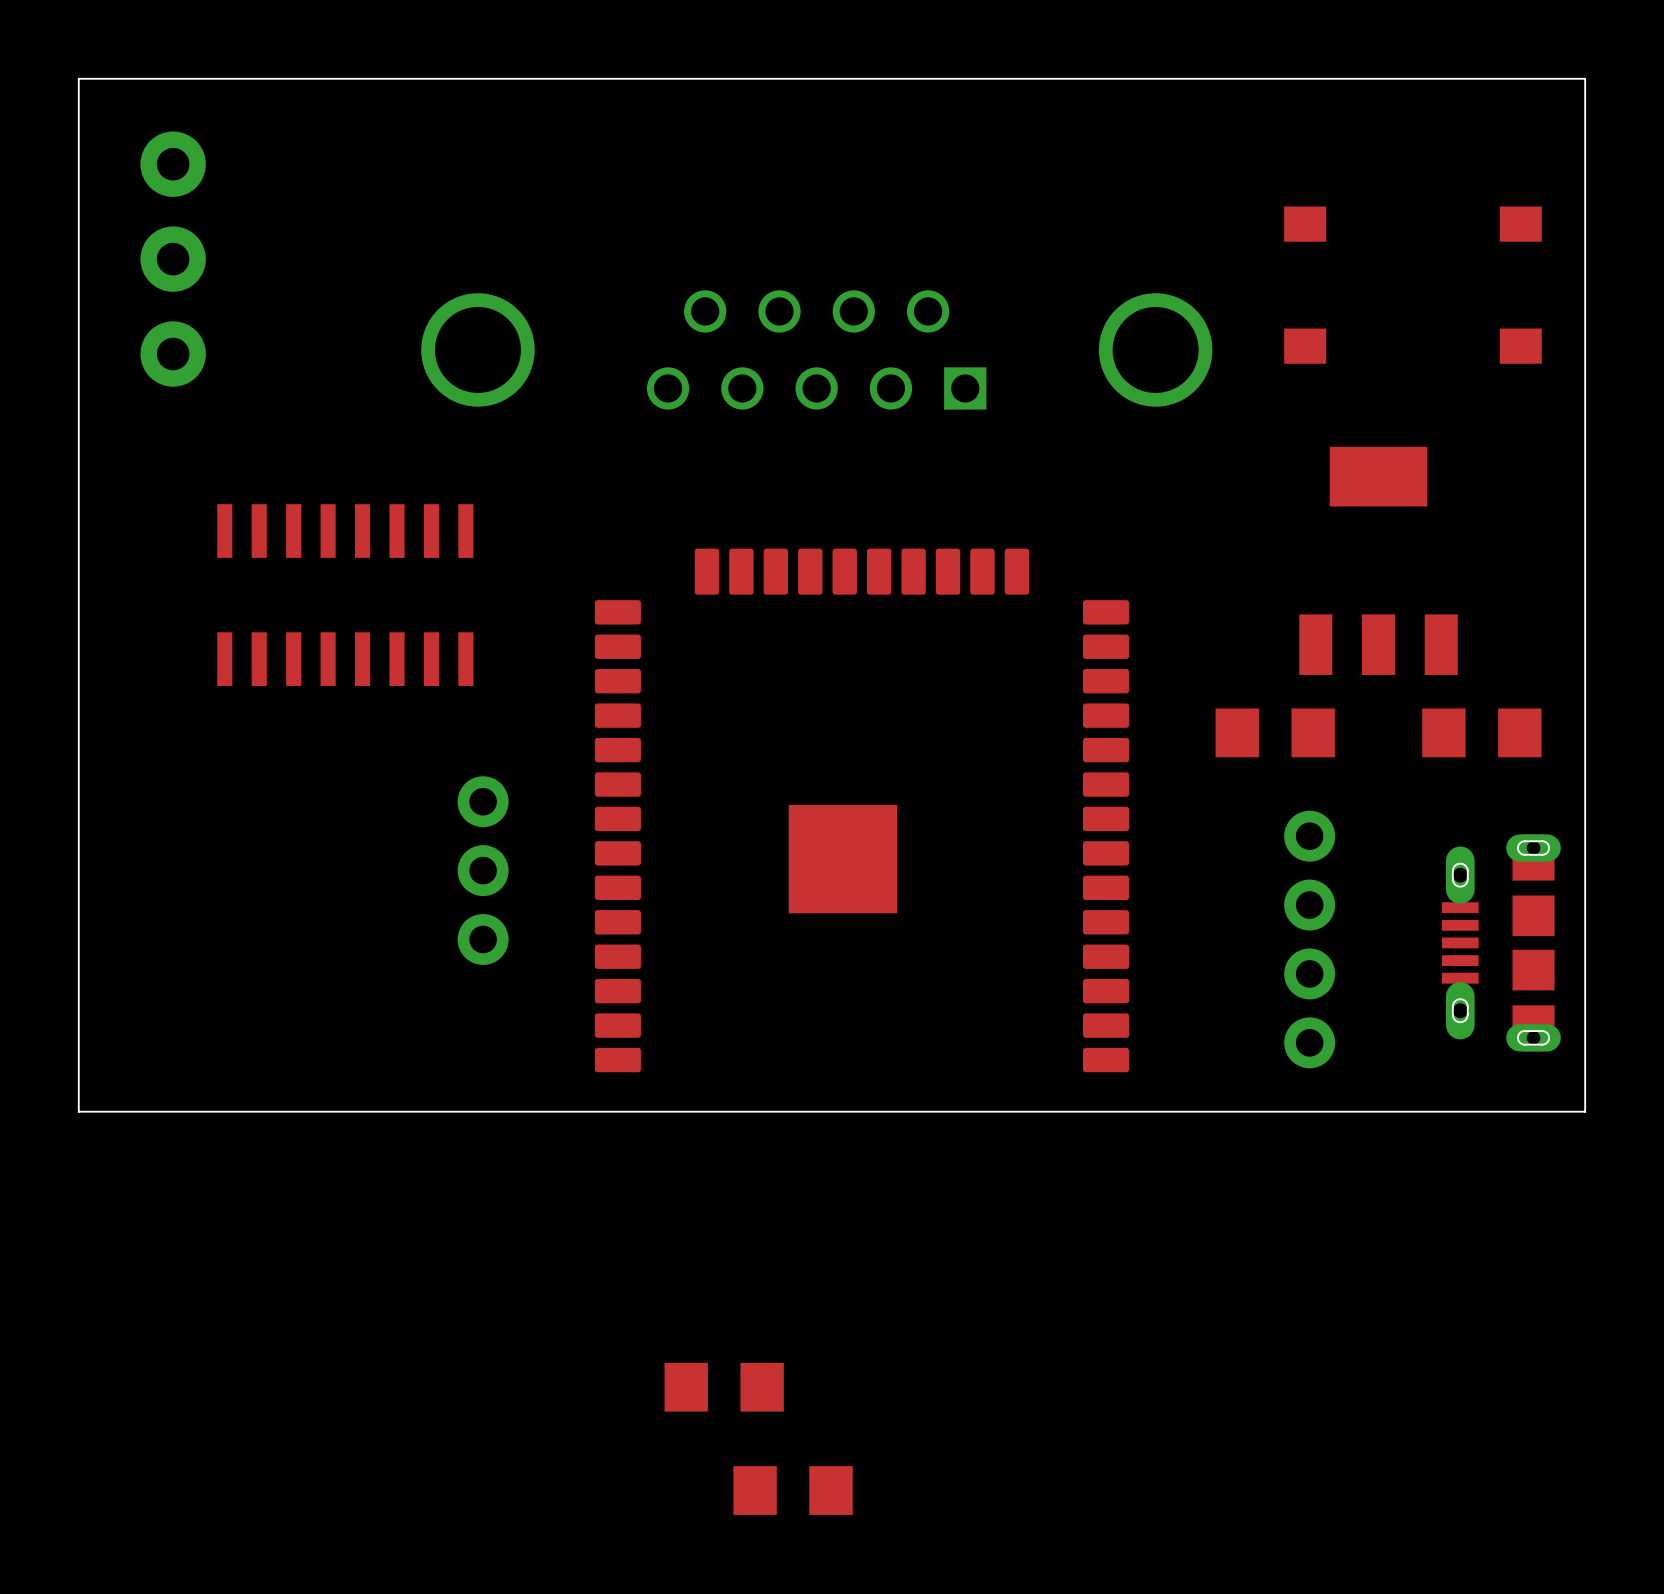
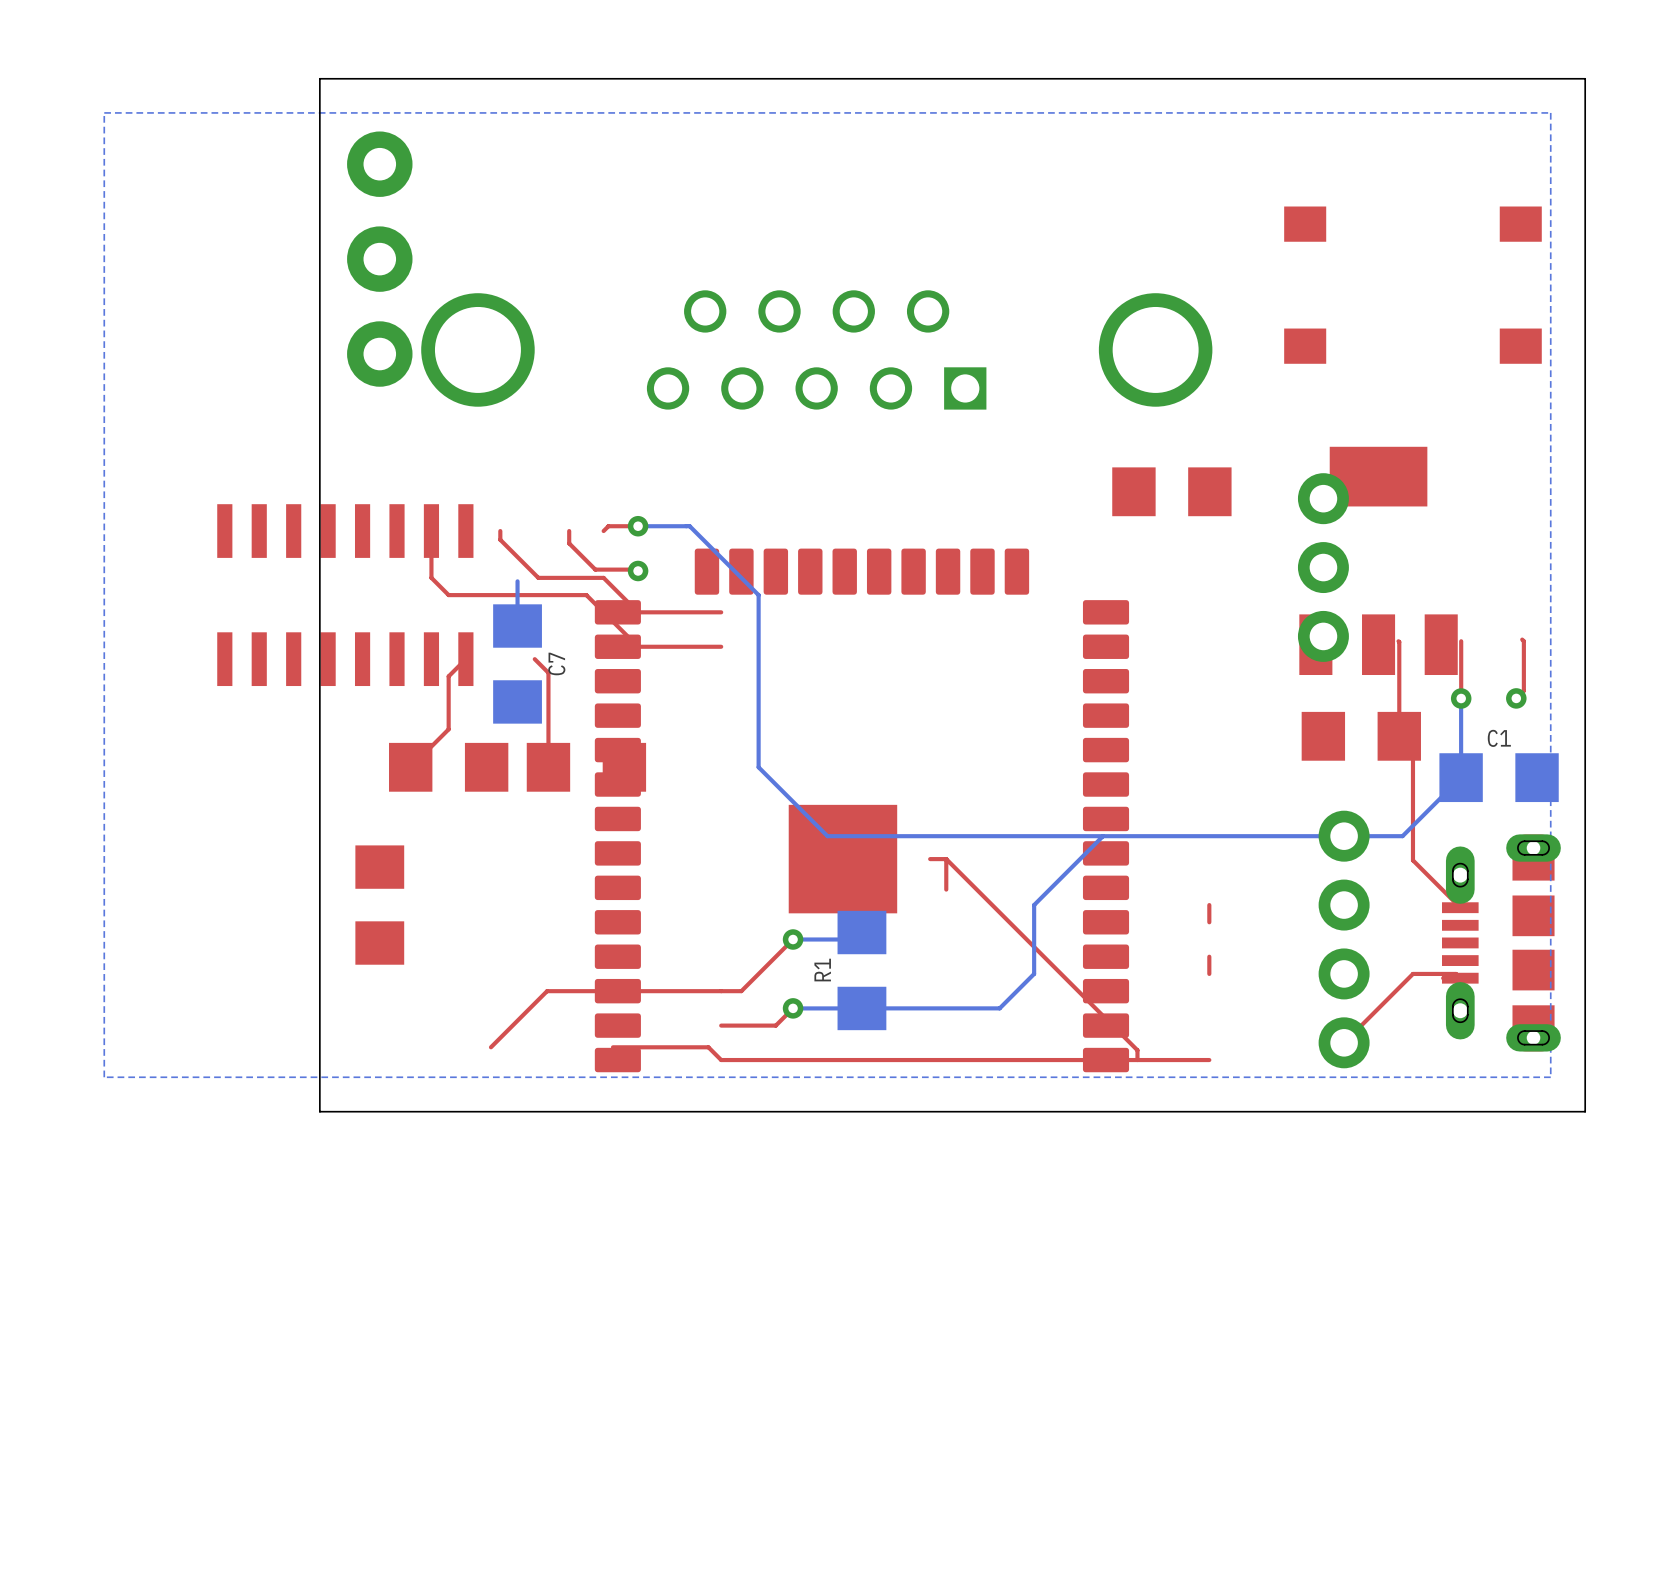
board edge: (319, 78) (78, 78) (78, 1111) (319, 1111) -> (319, 78) (319, 1111)
bottom zone outline: none -> (1550, 112) (1550, 1077) (104, 1077) (104, 112) (1550, 112)
part position: (173, 259) -> (379, 259)
part: none -> (1171, 491)
top track: none -> (638, 526) (608, 526) (603, 531)
bottom track: none -> (638, 526) (689, 526) (758, 595) (758, 767) (827, 836) (1402, 836) (1461, 777) (1461, 698)
via: none -> (638, 526)
top track: none -> (431, 531) (431, 577) (448, 595) (586, 595) (638, 646) (721, 646)
top track: none -> (500, 531) (500, 539) (538, 577) (603, 577) (638, 612) (721, 612)
top track: none -> (569, 531) (569, 543) (595, 569) (638, 570)
part: none -> (1323, 567)
via: none -> (638, 570)
bottom track: none -> (517, 581) (517, 626)
top track: none -> (1522, 639) (1523, 641) (1523, 690) (1516, 698)
top track: none -> (1398, 641) (1399, 736)
top track: none -> (1461, 641) (1461, 698)
top track: none -> (465, 659) (448, 676) (448, 729) (410, 767)
top track: none -> (534, 659) (548, 672) (548, 767)
C7: none -> (517, 663)
via: none -> (1461, 698)
via: none -> (1516, 698)
part position: (1275, 732) -> (1361, 736)
C1 side: top (1481, 732) -> bottom (1499, 777)
top track: none -> (1399, 736) (1412, 750) (1412, 860) (1460, 907)
part: none -> (448, 767)
part: none -> (586, 767)
bottom track: none -> (1103, 836) (1034, 905) (1034, 973) (999, 1008) (793, 1008)
top track: none -> (946, 859) (930, 859)
top track: none -> (946, 859) (946, 889)
top track: none -> (946, 859) (1137, 1050) (1137, 1060)
part: (483, 870) -> none
part: none -> (379, 905)
top track: none -> (1209, 905) (1209, 922)
bottom track: none -> (861, 932) (854, 939) (793, 939)
top track: none -> (793, 939) (741, 991) (547, 991) (490, 1047)
via: none -> (793, 939)
part position: (1309, 939) -> (1344, 939)
top track: none -> (1209, 956) (1209, 973)
top track: none -> (1443, 978) (1460, 978) (1456, 973) (1412, 973) (1344, 1042)
top track: none -> (793, 1008) (775, 1025) (721, 1025)
via: none -> (793, 1008)
top track: none -> (613, 1047) (708, 1047) (721, 1060) (1209, 1060)
R1 side: top (724, 1387) -> bottom (861, 970)
part: (793, 1490) -> none

